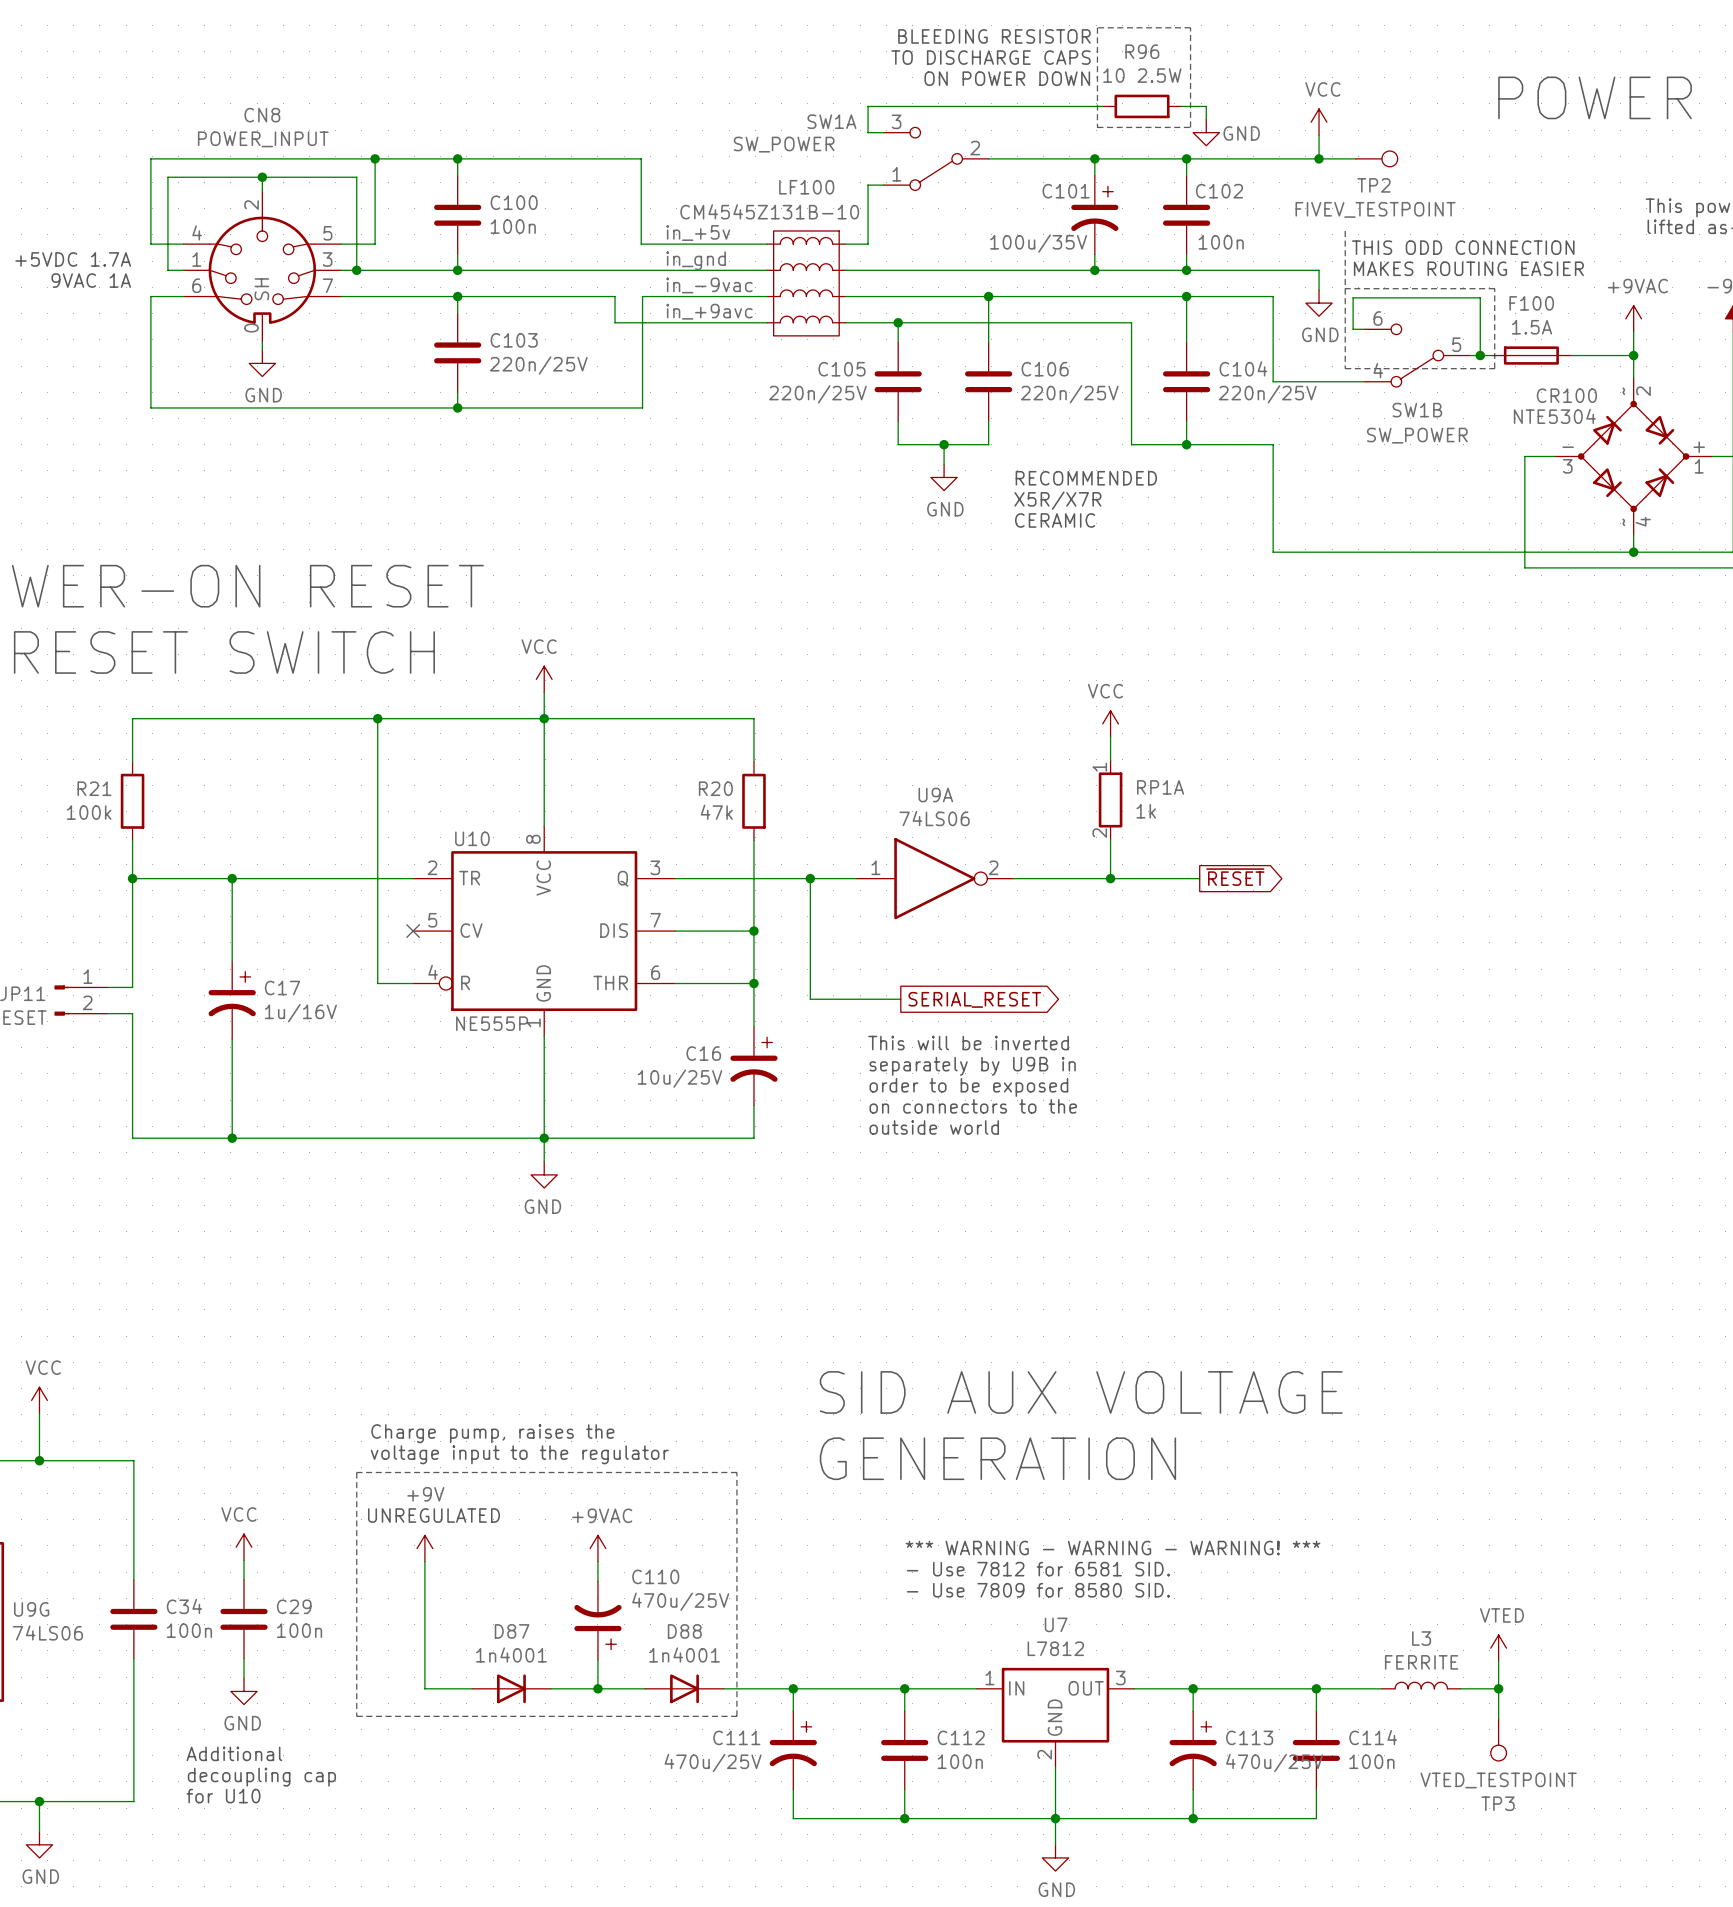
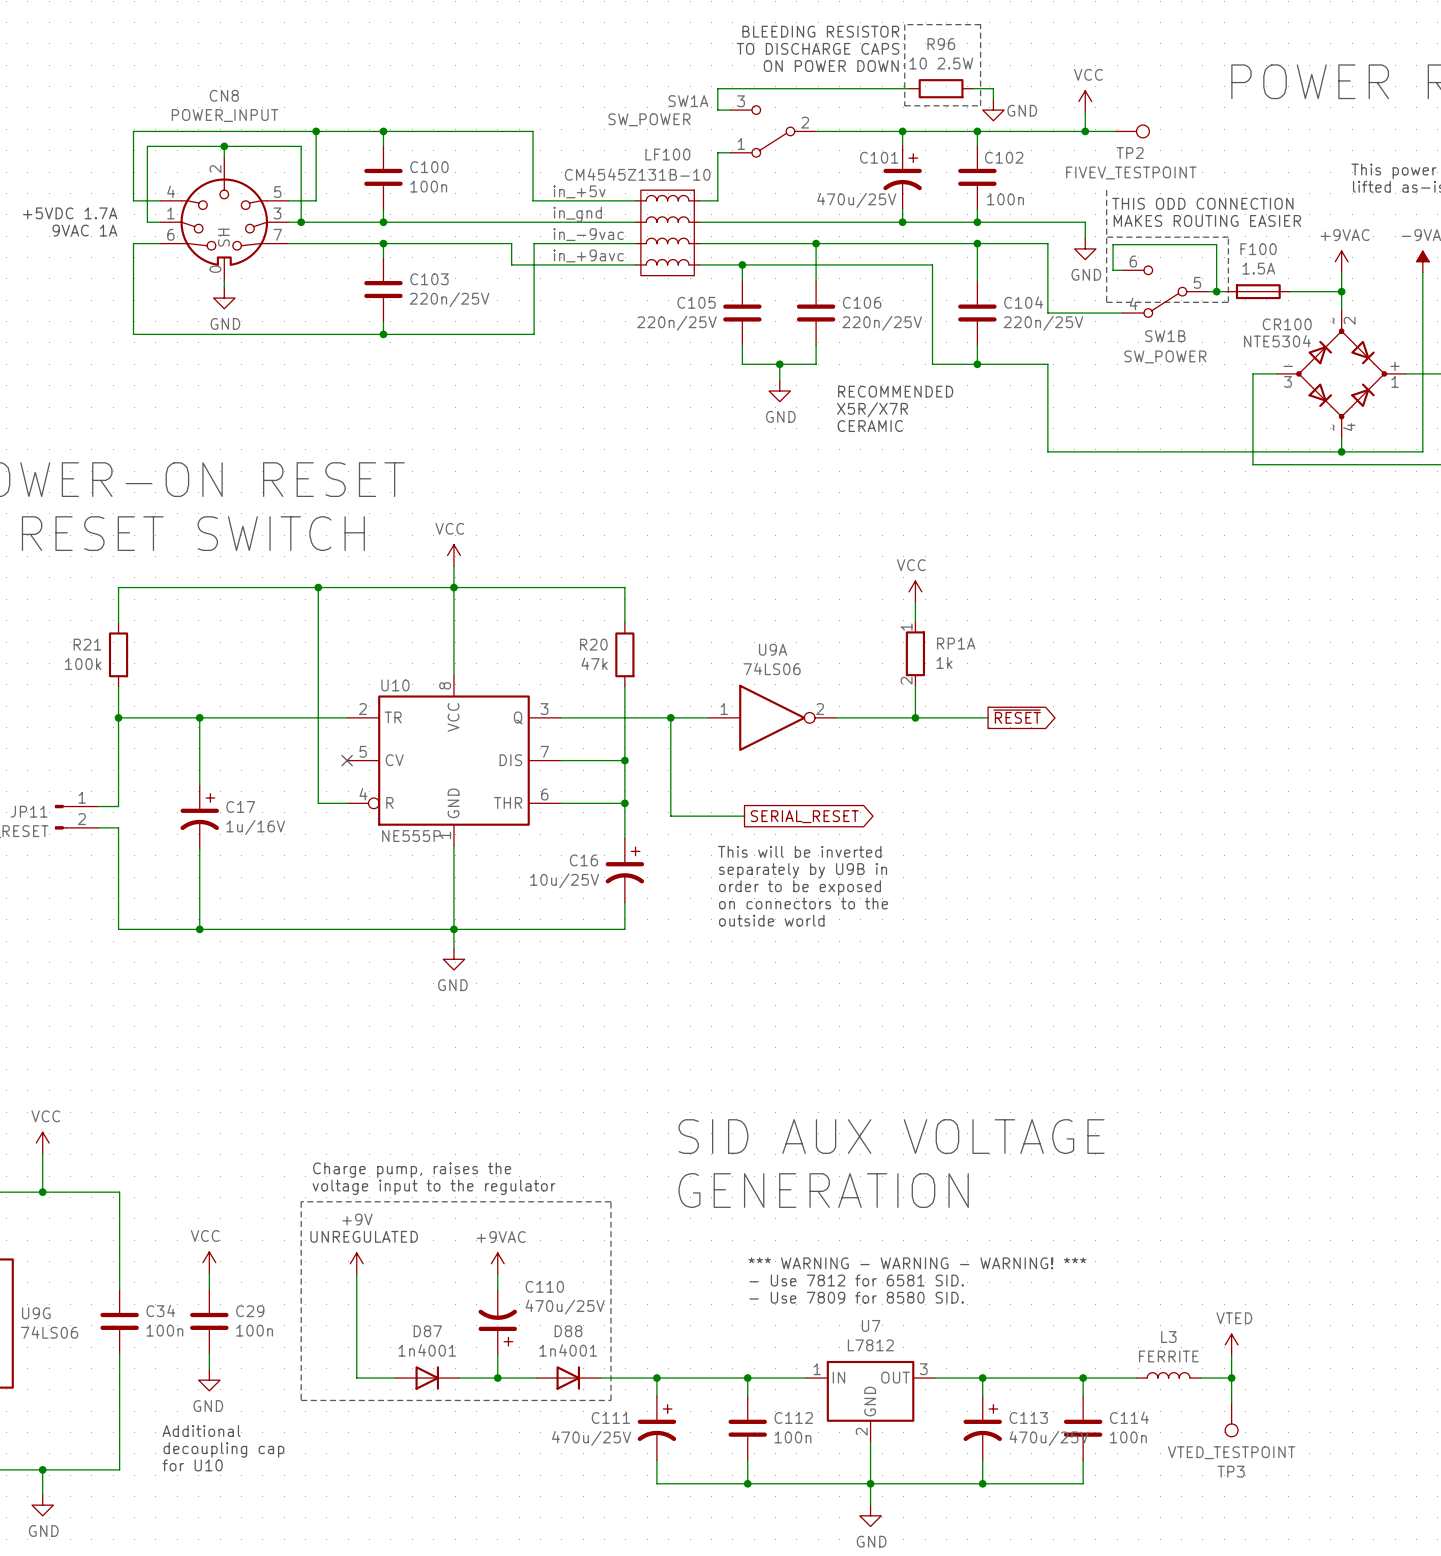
C101 value: 100u/35V (1038, 243) -> 470u/25V (856, 200)

